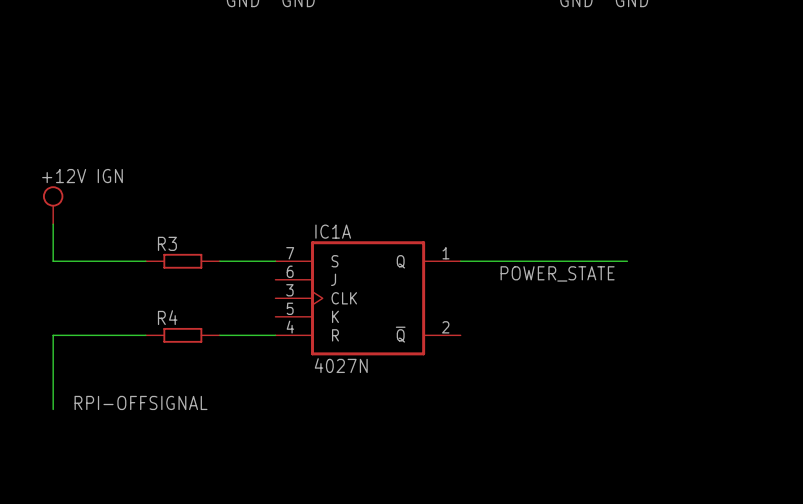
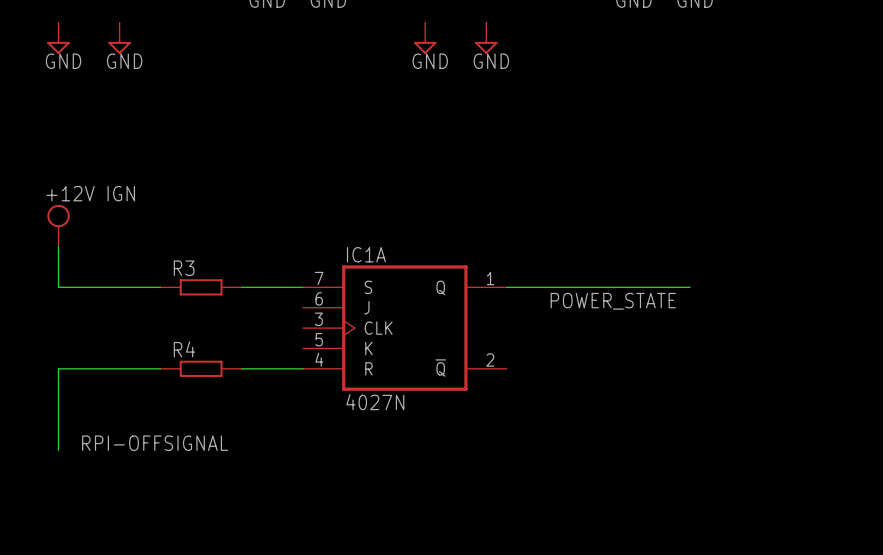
power symbol: none -> GND (58, 38)
power symbol: none -> GND (119, 38)
power symbol: none -> GND (425, 38)
power symbol: none -> GND (486, 38)

